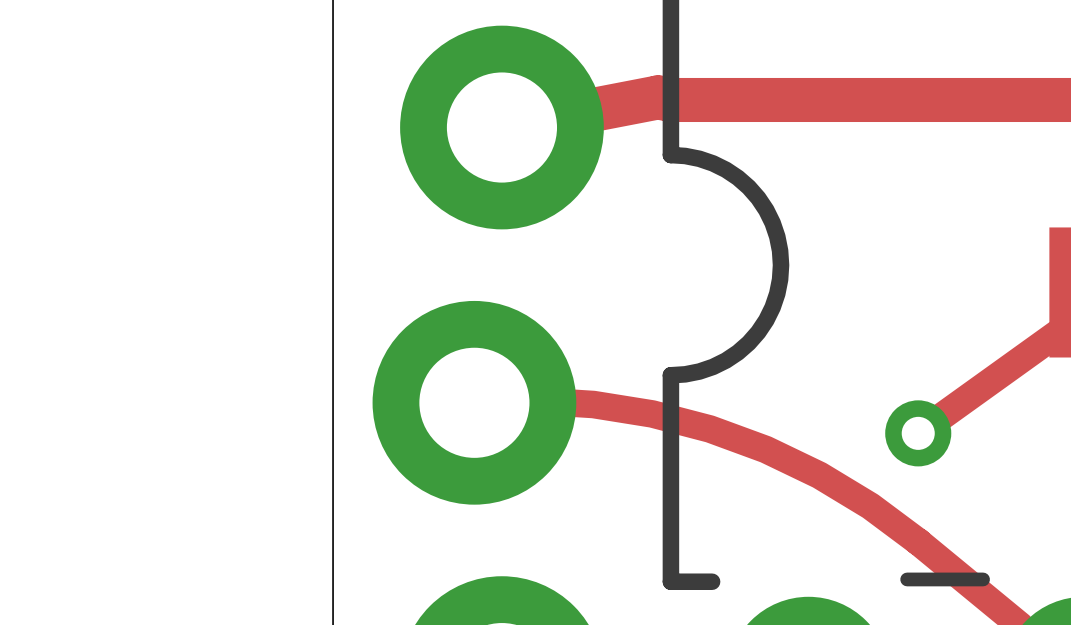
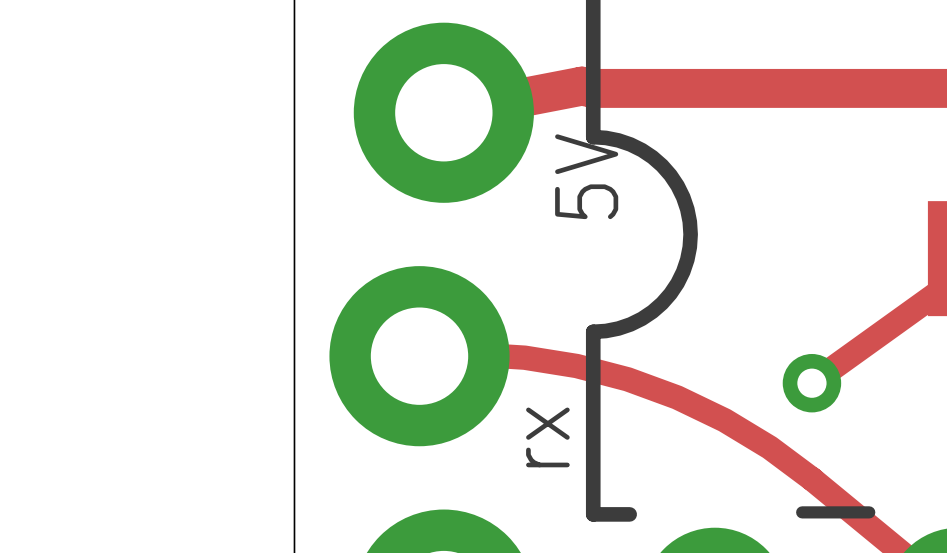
text: none -> 5V (586, 176)
text: none -> rx (547, 437)

